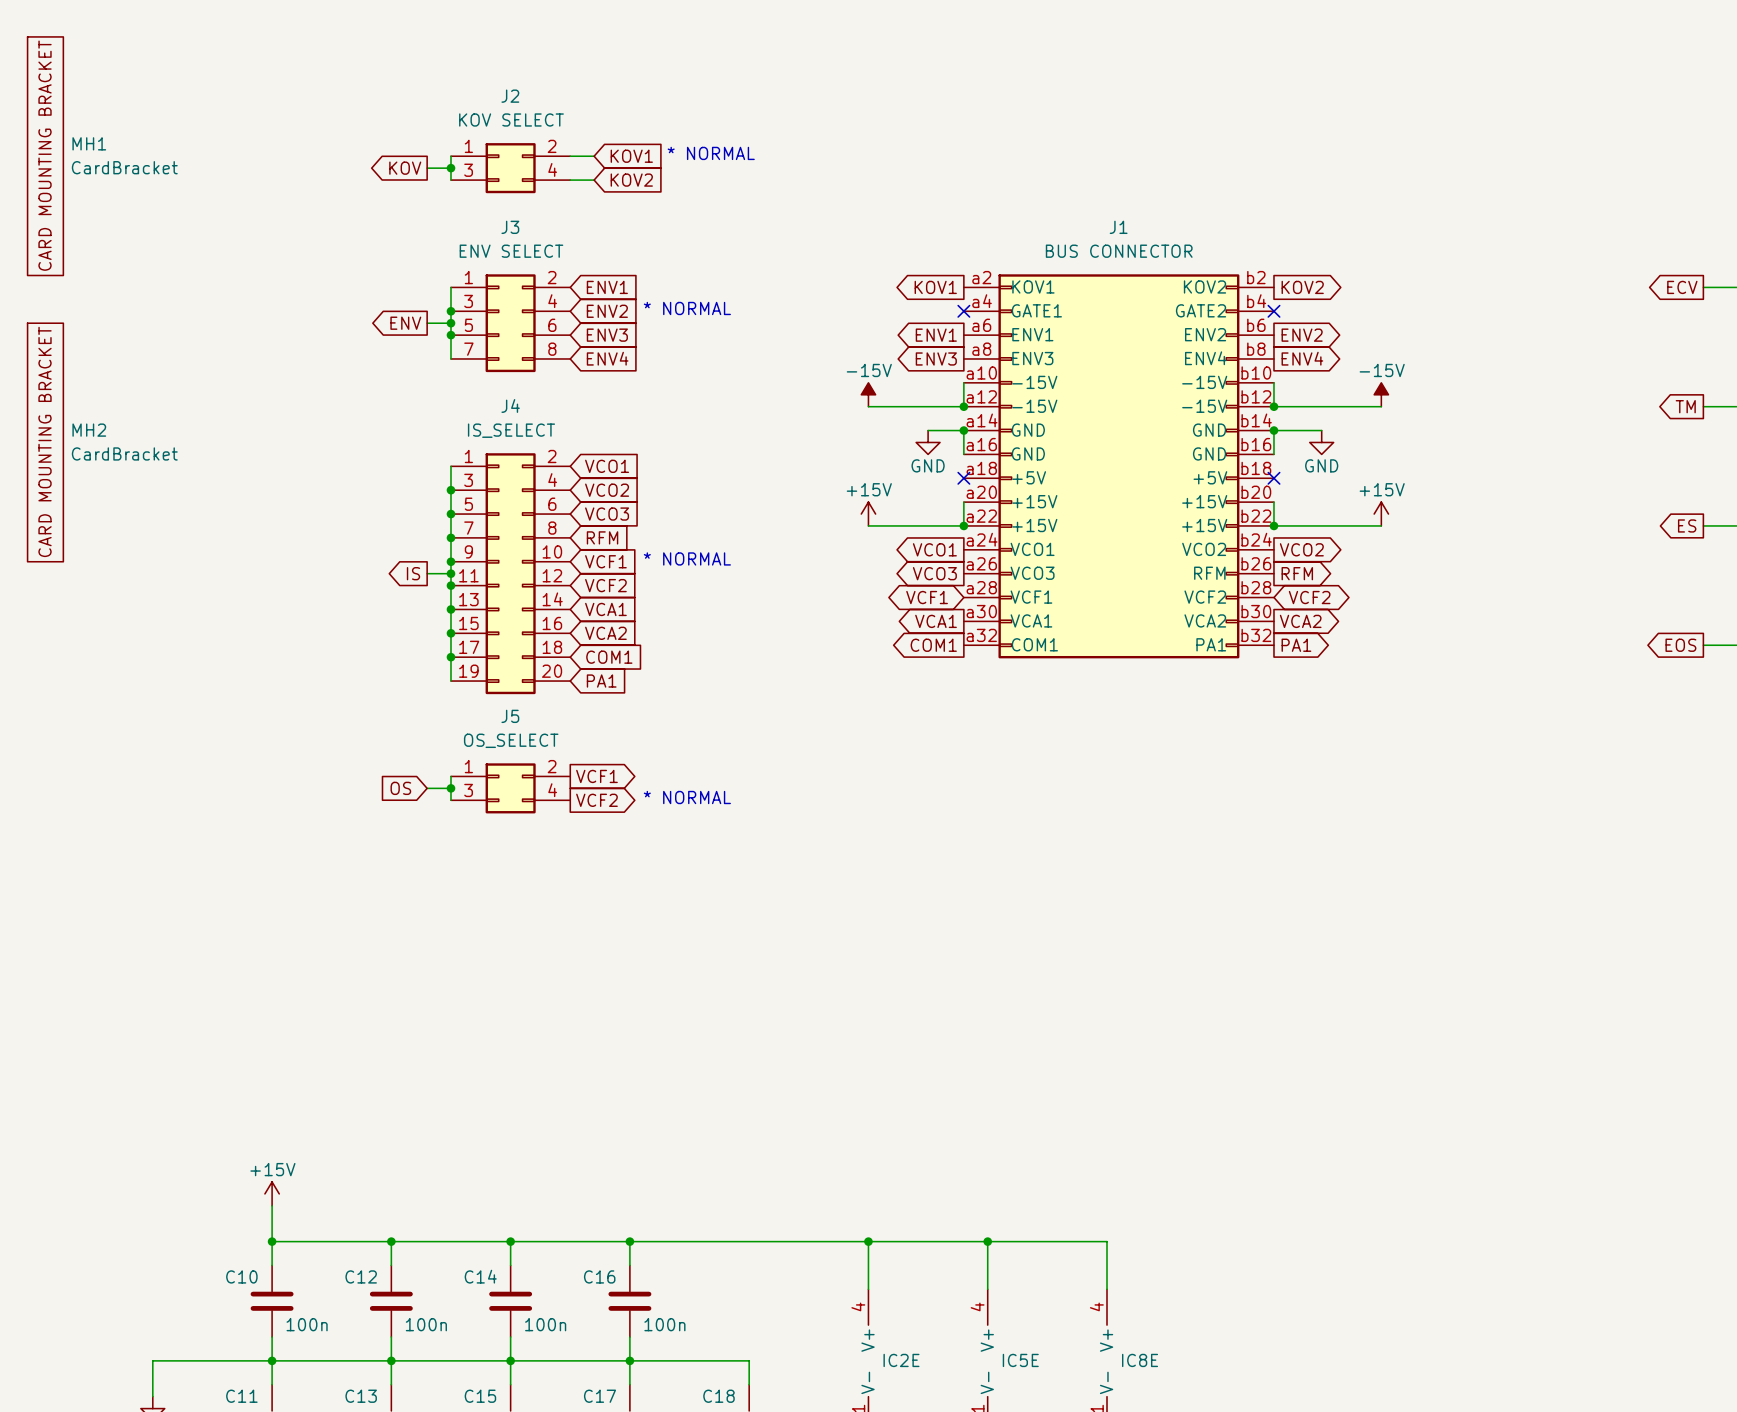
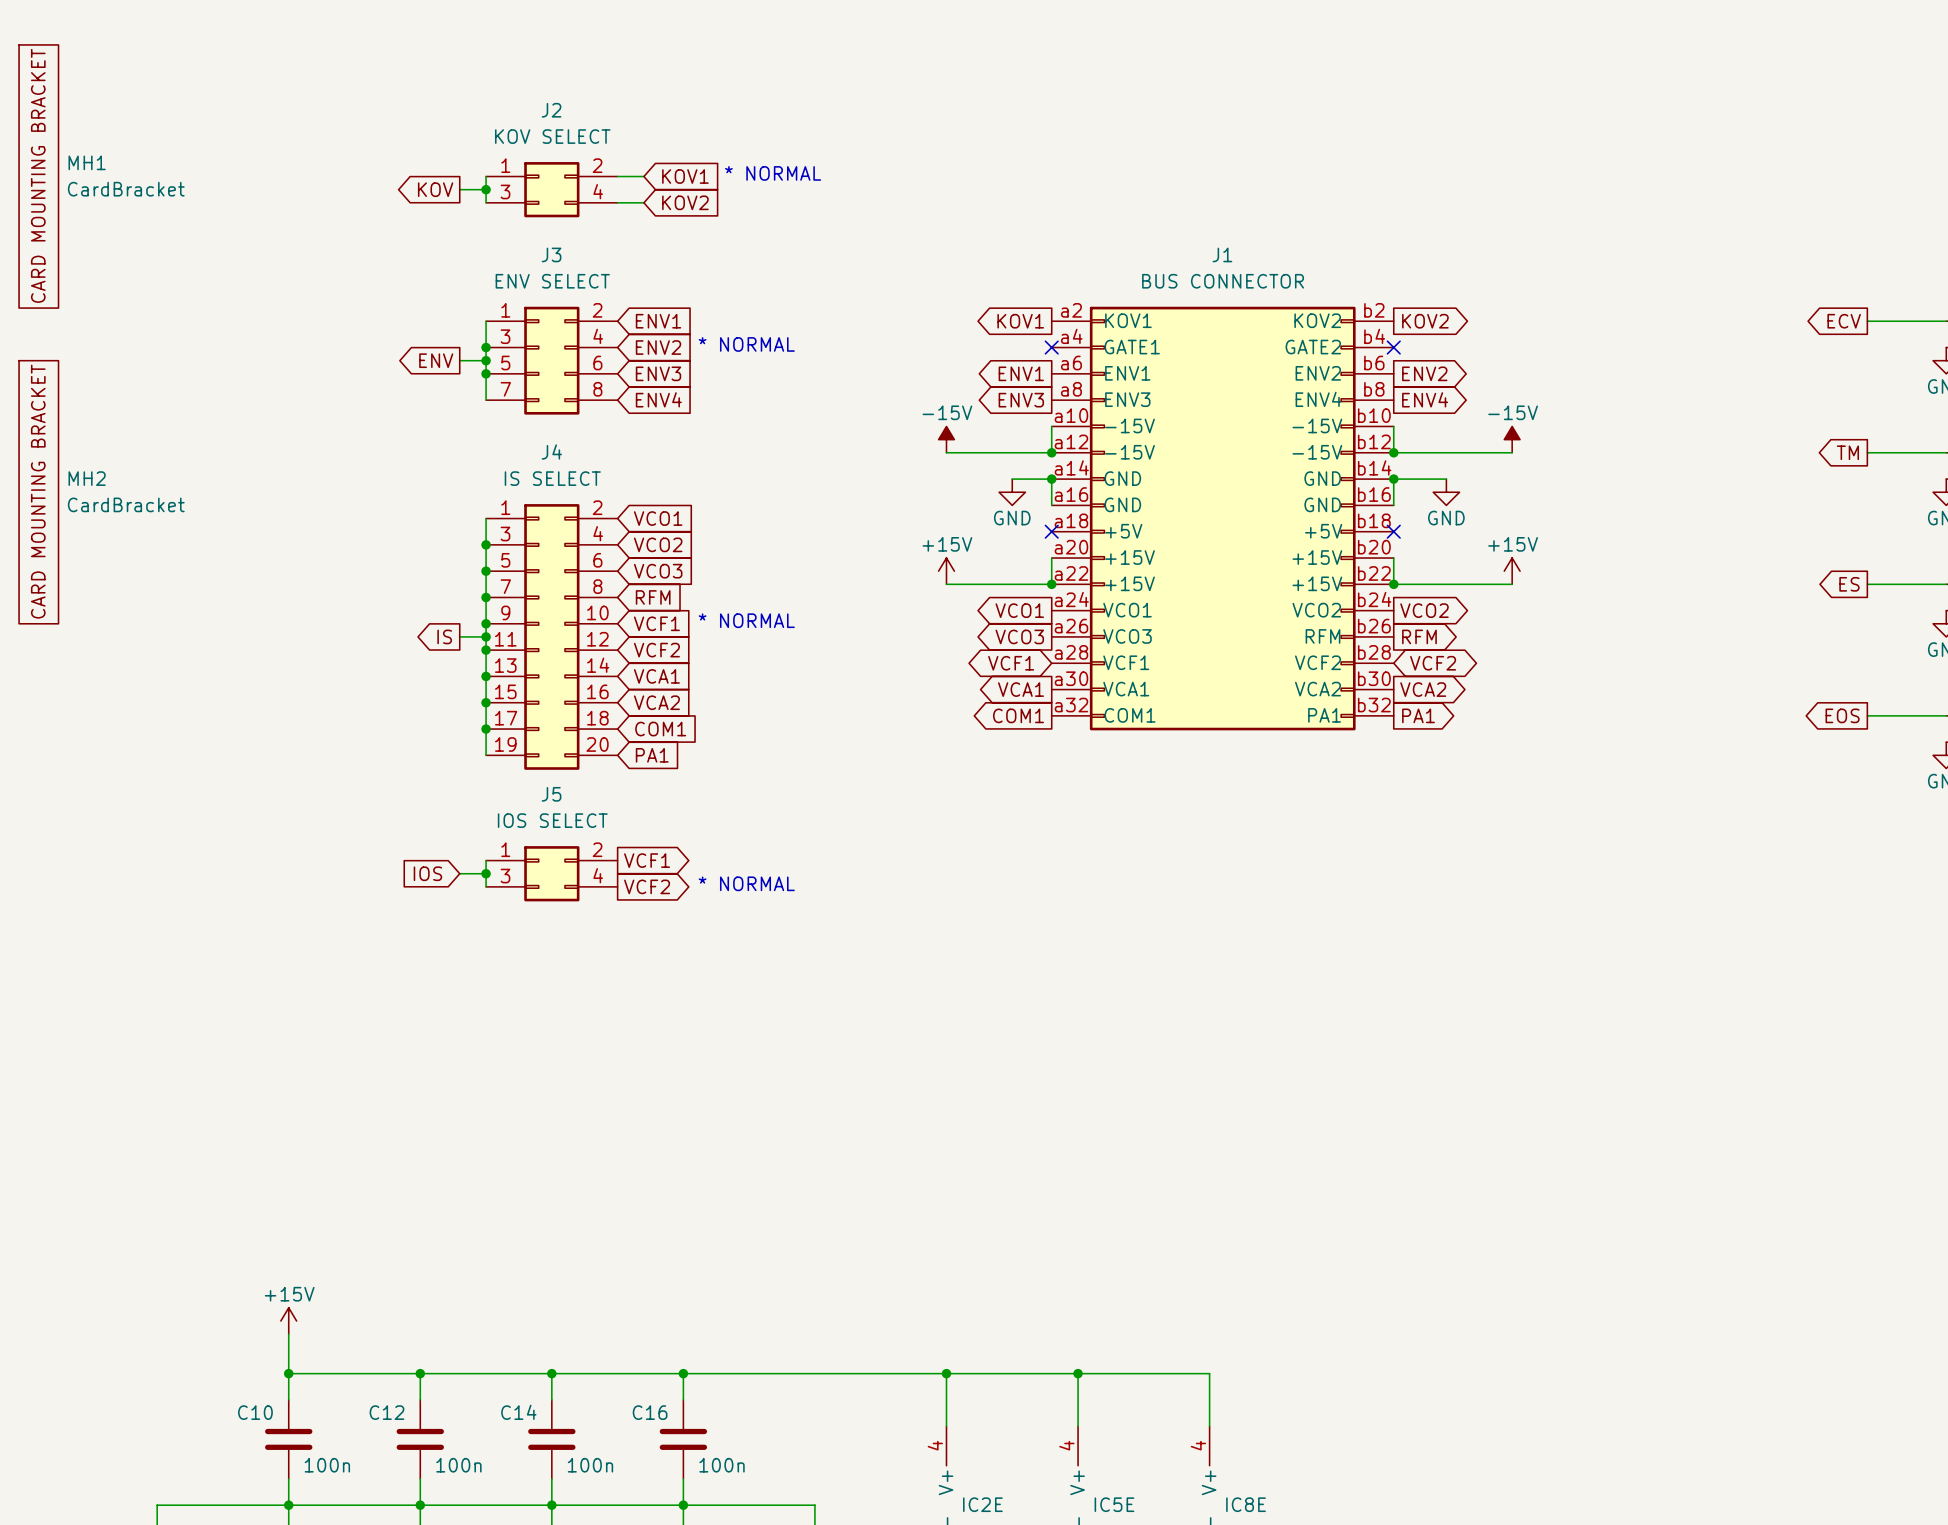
J4 value: IS_SELECT (511, 430) -> IS SELECT (552, 478)
J5 value: OS_SELECT (511, 740) -> IOS SELECT (552, 820)
global label: OS (400, 788) -> IOS (427, 873)

